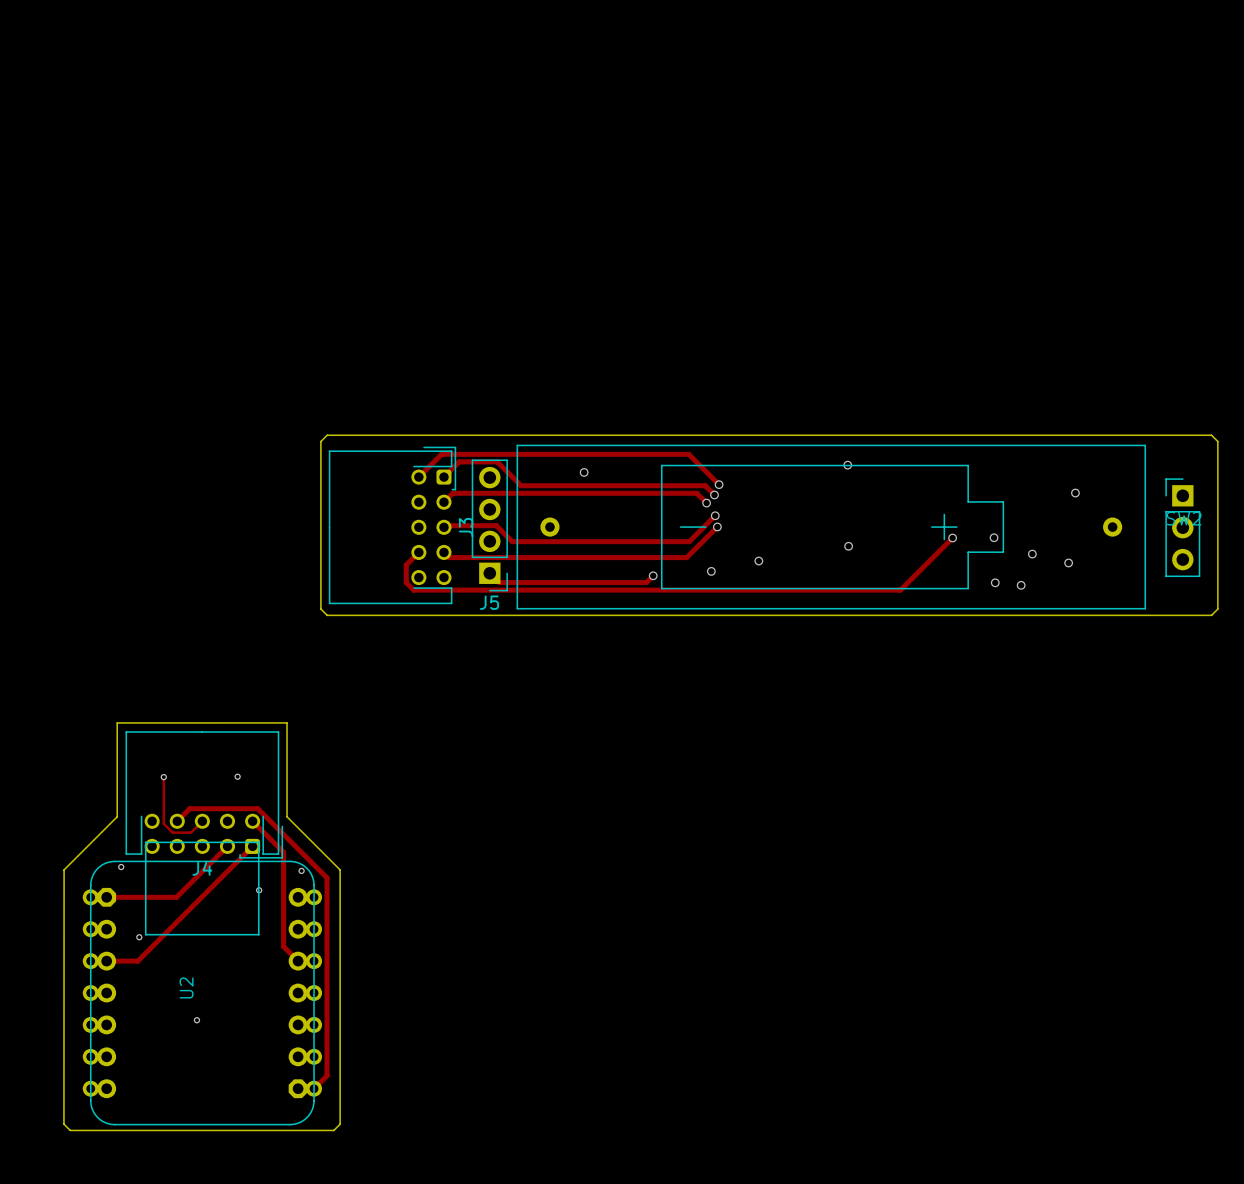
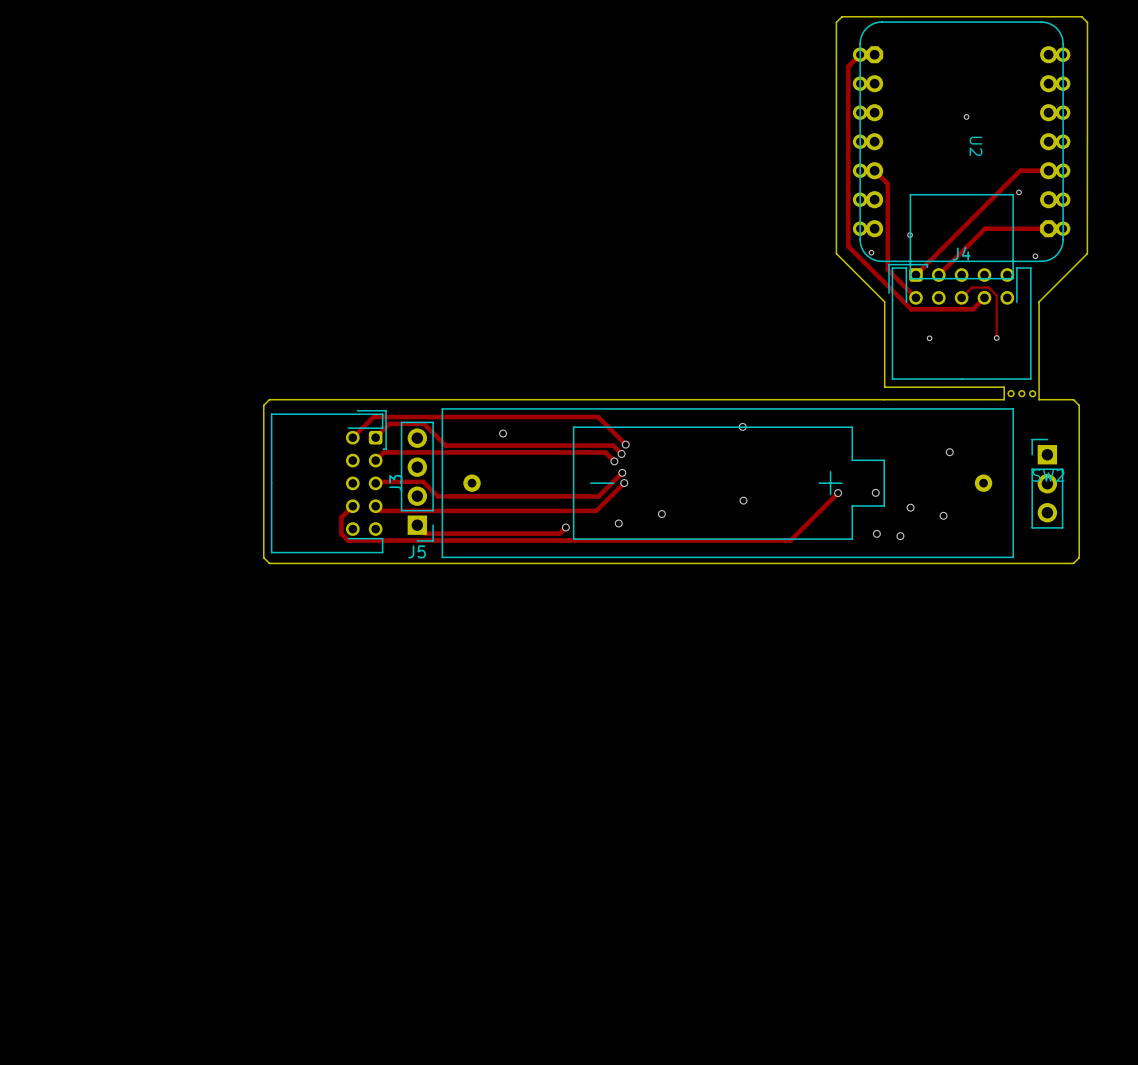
track: none -> (860, 54) (848, 66) (848, 246) (911, 309) (973, 309) (984, 297)
via: none -> (966, 116)
track: none -> (874, 170) (887, 183) (887, 269) (915, 297)
track: none -> (1048, 170) (1020, 170) (915, 275)
via: none -> (1018, 192)
track: none -> (1048, 228) (985, 228) (938, 275)
via: none -> (910, 235)
via: none -> (871, 252)
via: none -> (1035, 256)
track: none -> (961, 297) (971, 287) (988, 287) (996, 295) (996, 338)
via: none -> (929, 338)
via: none -> (996, 338)
part: none -> (1011, 393)
part: none -> (1021, 393)
part: none -> (1032, 393)
board edge: (1135, 435) (1173, 435) -> (1004, 399) (1004, 387) (884, 387) (884, 301) (836, 253) (836, 22) (842, 16) (1081, 16) (1087, 22) (1087, 253) (1039, 301) (1039, 399)
board edge: (117, 722) (117, 816) (64, 869) (63, 1124) (70, 1130) (333, 1130) (340, 1124) (340, 869) (287, 816) (287, 722) (117, 722) -> none
via: (237, 776) -> none
track: (163, 777) (163, 823) (172, 832) (191, 832) (202, 821) -> none
via: (163, 777) -> none
J4 rotation: 0° (204, 794) -> 180° (959, 321)
J4 position: (204, 794) -> (959, 321)
track: (177, 821) (189, 808) (257, 808) (327, 877) (327, 1075) (314, 1088) -> none
track: (252, 821) (283, 852) (283, 946) (298, 961) -> none
track: (227, 846) (176, 897) (106, 897) -> none
track: (252, 846) (137, 961) (106, 961) -> none
via: (121, 867) -> none
via: (301, 870) -> none
via: (259, 890) -> none
via: (139, 937) -> none
U2 rotation: 0° (202, 983) -> 180° (961, 150)
U2 position: (202, 983) -> (961, 150)
via: (196, 1020) -> none

